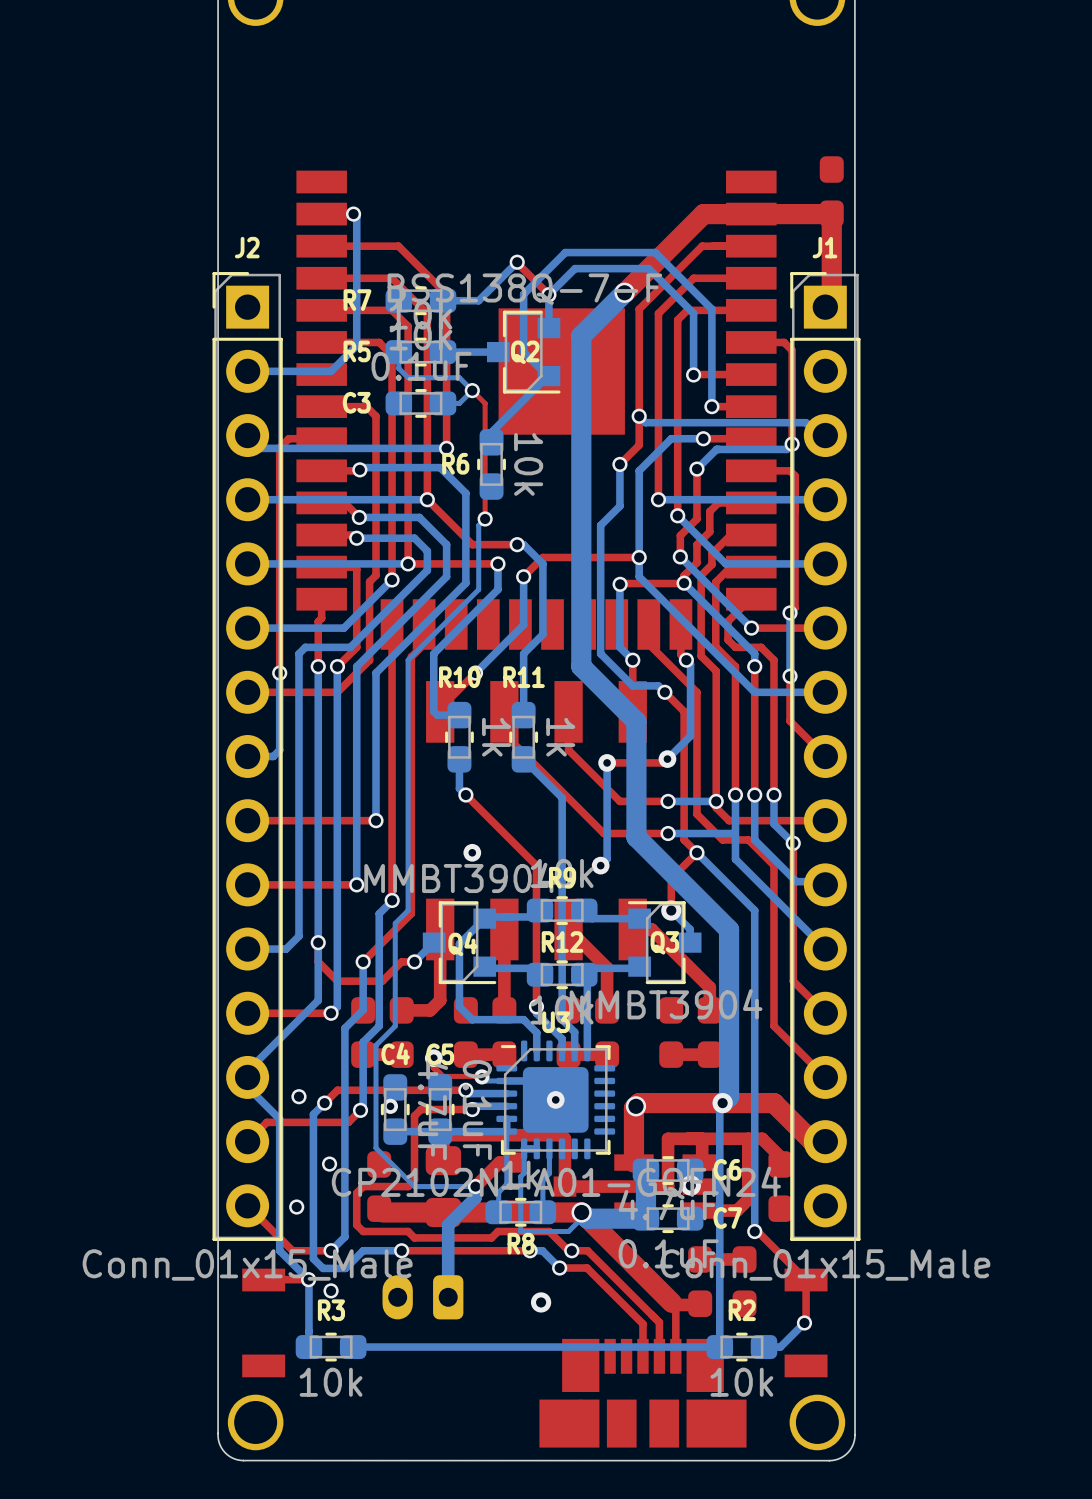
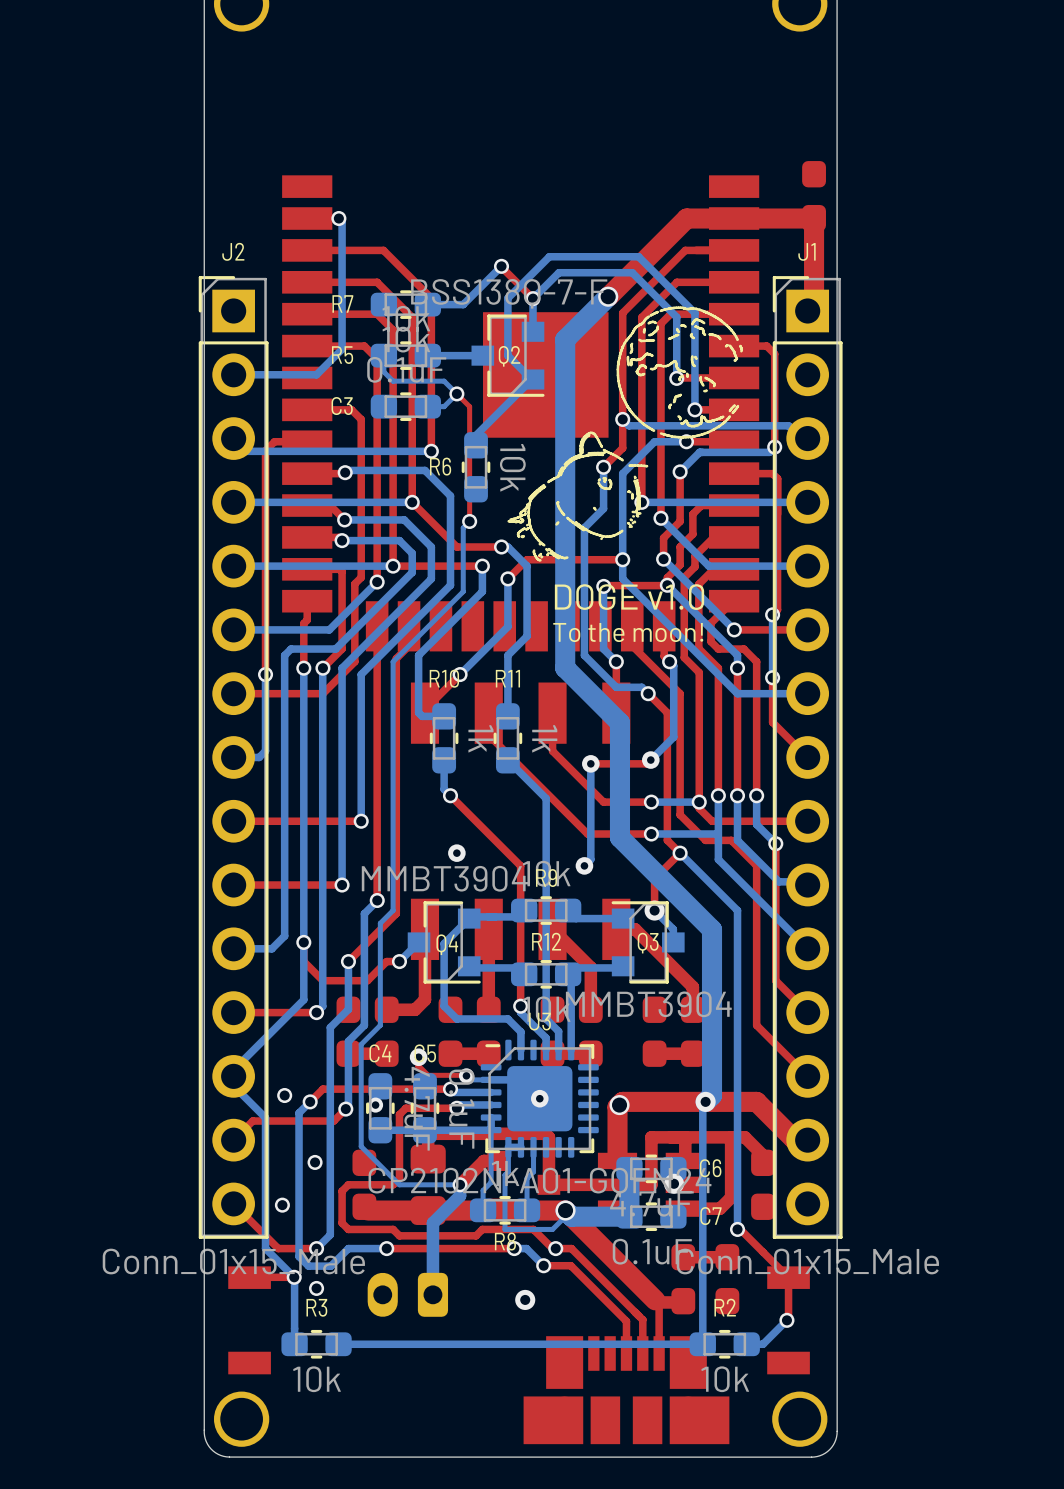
line: none -> (670, 308) (660, 310)
line: none -> (684, 308) (670, 308)
line: none -> (684, 308) (690, 308)
line: none -> (690, 308) (704, 311)
line: none -> (704, 311) (714, 316)
line: none -> (657, 312) (650, 315)
line: none -> (648, 316) (644, 320)
line: none -> (715, 317) (720, 320)
line: none -> (697, 319) (692, 324)
line: none -> (697, 319) (704, 323)
line: none -> (720, 320) (729, 327)
line: none -> (643, 321) (640, 324)
line: none -> (655, 322) (648, 323)
line: none -> (639, 324) (635, 327)
line: none -> (681, 325) (685, 326)
line: none -> (657, 326) (656, 330) (649, 335)
line: none -> (695, 326) (697, 327)
line: none -> (698, 327) (700, 328)
line: none -> (700, 328) (705, 334)
line: none -> (729, 328) (731, 329)
line: none -> (634, 328) (633, 331)
line: none -> (644, 328) (644, 332)
line: none -> (677, 328) (678, 331)
line: none -> (731, 330) (737, 339)
line: none -> (633, 331) (626, 340)
line: none -> (691, 334) (693, 338)
line: none -> (709, 334) (712, 334)
line: none -> (678, 334) (669, 338)
line: none -> (713, 334) (716, 335)
line: none -> (717, 336) (720, 339)
line: none -> (626, 340) (622, 347)
line: none -> (639, 339) (653, 340)
line: none -> (632, 343) (630, 352)
line: none -> (727, 345) (726, 346)
line: none -> (729, 345) (734, 352)
line: none -> (740, 345) (741, 349)
line: none -> (622, 347) (620, 352)
line: none -> (741, 350) (741, 351)
line: none -> (620, 353) (617, 375) (622, 396)
line: none -> (734, 353) (736, 357)
line: none -> (646, 354) (644, 356)
line: none -> (648, 354) (652, 355)
line: none -> (692, 356) (692, 358)
line: none -> (628, 356) (628, 365)
line: none -> (643, 356) (641, 358)
line: none -> (695, 356) (696, 358)
line: none -> (640, 359) (638, 359)
line: none -> (692, 359) (694, 365)
line: none -> (631, 360) (631, 362)
line: none -> (638, 359) (633, 359)
line: none -> (735, 360) (734, 360)
line: none -> (631, 363) (631, 365)
line: none -> (671, 363) (675, 361) (676, 364)
line: none -> (671, 363) (666, 366) (660, 365)
line: none -> (676, 364) (677, 368)
line: none -> (640, 365) (645, 367)
line: none -> (640, 366) (636, 371) (639, 374)
line: none -> (660, 365) (656, 366)
line: none -> (655, 367) (651, 368)
line: none -> (677, 368) (679, 370)
line: none -> (679, 370) (684, 371)
line: none -> (644, 373) (640, 375)
line: none -> (687, 373) (687, 376)
line: none -> (682, 376) (679, 380)
line: none -> (700, 377) (703, 385)
line: none -> (705, 377) (711, 381)
line: none -> (711, 381) (713, 382)
line: none -> (713, 383) (714, 386)
line: none -> (704, 391) (704, 391)
line: none -> (706, 390) (705, 391)
line: none -> (680, 394) (675, 396) (673, 402)
line: none -> (622, 396) (627, 406)
line: none -> (670, 404) (669, 408)
line: none -> (734, 405) (729, 411)
line: none -> (737, 406) (732, 412)
line: none -> (629, 409) (643, 423)
line: none -> (678, 416) (680, 419)
line: none -> (702, 416) (701, 419)
line: none -> (704, 417) (706, 420)
line: none -> (723, 416) (720, 417)
line: none -> (729, 416) (719, 426) (704, 433) (688, 437) (668, 435)
line: none -> (719, 418) (714, 420)
line: none -> (701, 419) (701, 421)
line: none -> (706, 420) (710, 421)
line: none -> (713, 420) (711, 421)
line: none -> (684, 421) (687, 422)
line: none -> (684, 422) (681, 423)
line: none -> (700, 423) (691, 426) (687, 423)
line: none -> (644, 424) (654, 430)
line: none -> (591, 432) (582, 439) (580, 455) (564, 464)
line: none -> (592, 432) (601, 446)
line: none -> (661, 433) (667, 435)
line: none -> (589, 435) (583, 441) (582, 453)
line: none -> (603, 449) (609, 453)
line: none -> (604, 452) (588, 453)
line: none -> (610, 453) (622, 460)
line: none -> (602, 454) (588, 455) (573, 459) (564, 467) (560, 475)
line: none -> (629, 465) (647, 466)
line: none -> (562, 467) (558, 476) (548, 482)
line: none -> (634, 476) (635, 478)
line: none -> (605, 478) (603, 478)
line: none -> (599, 479) (598, 480)
line: none -> (605, 480) (604, 481)
line: none -> (609, 479) (610, 482)
line: none -> (637, 480) (636, 480)
line: none -> (634, 480) (637, 502) (636, 512) (632, 511)
line: none -> (636, 481) (639, 492) (639, 509)
line: none -> (598, 482) (604, 488) (610, 487)
line: none -> (611, 483) (610, 487)
line: none -> (543, 485) (529, 498)
line: none -> (545, 486) (530, 499) (529, 520)
line: none -> (628, 491) (630, 492)
line: none -> (632, 493) (632, 498)
line: none -> (558, 502) (558, 506) (564, 514)
line: none -> (527, 504) (523, 510)
line: none -> (594, 508) (595, 509)
line: none -> (522, 511) (520, 514)
line: none -> (525, 511) (525, 511)
line: none -> (525, 513) (524, 514)
line: none -> (639, 513) (638, 513)
line: none -> (640, 513) (639, 513)
line: none -> (637, 514) (638, 516)
line: none -> (522, 515) (510, 519)
line: none -> (633, 516) (633, 516)
line: none -> (567, 517) (583, 530)
line: none -> (522, 519) (520, 519)
line: none -> (522, 519) (520, 522)
line: none -> (630, 519) (631, 520)
line: none -> (508, 521) (518, 521) (515, 522)
line: none -> (529, 521) (534, 535) (544, 545)
line: none -> (558, 522) (556, 524)
line: none -> (575, 522) (590, 531)
line: none -> (634, 521) (635, 522)
line: none -> (628, 523) (629, 523)
line: none -> (633, 522) (632, 523)
line: none -> (527, 524) (527, 525)
line: none -> (631, 526) (629, 526)
line: none -> (524, 528) (518, 532) (518, 536)
line: none -> (528, 528) (526, 529)
line: none -> (622, 530) (612, 535) (605, 536)
line: none -> (590, 532) (603, 536)
line: none -> (522, 536) (521, 536)
line: none -> (523, 536) (522, 537)
line: none -> (601, 538) (601, 538)
line: none -> (539, 543) (540, 544)
line: none -> (546, 549) (547, 550)
line: none -> (548, 549) (559, 556) (567, 557)
line: none -> (534, 550) (535, 556) (540, 560)
line: none -> (550, 552) (558, 558)
line: none -> (540, 554) (539, 555)
line: none -> (548, 553) (547, 555)
line: none -> (542, 556) (541, 557)
text: none -> DOGE v1.0 (629, 597)
text: none -> To the moon! (628, 632)

